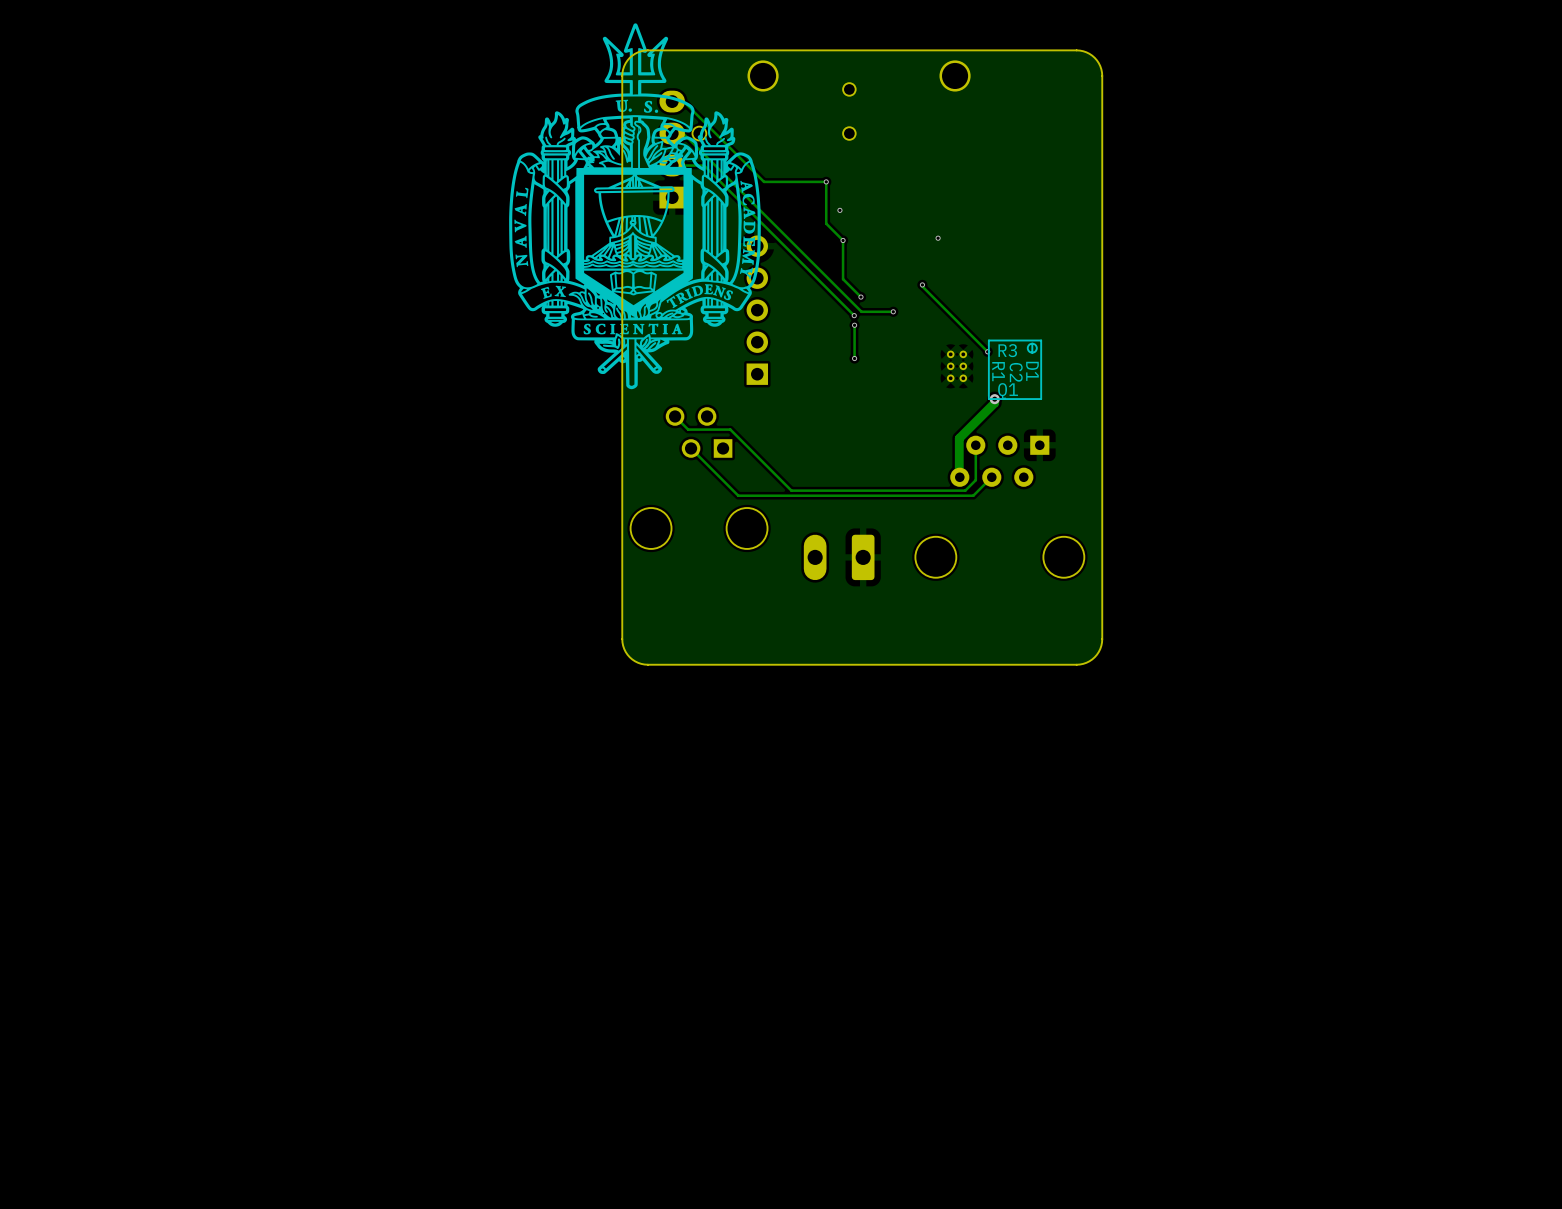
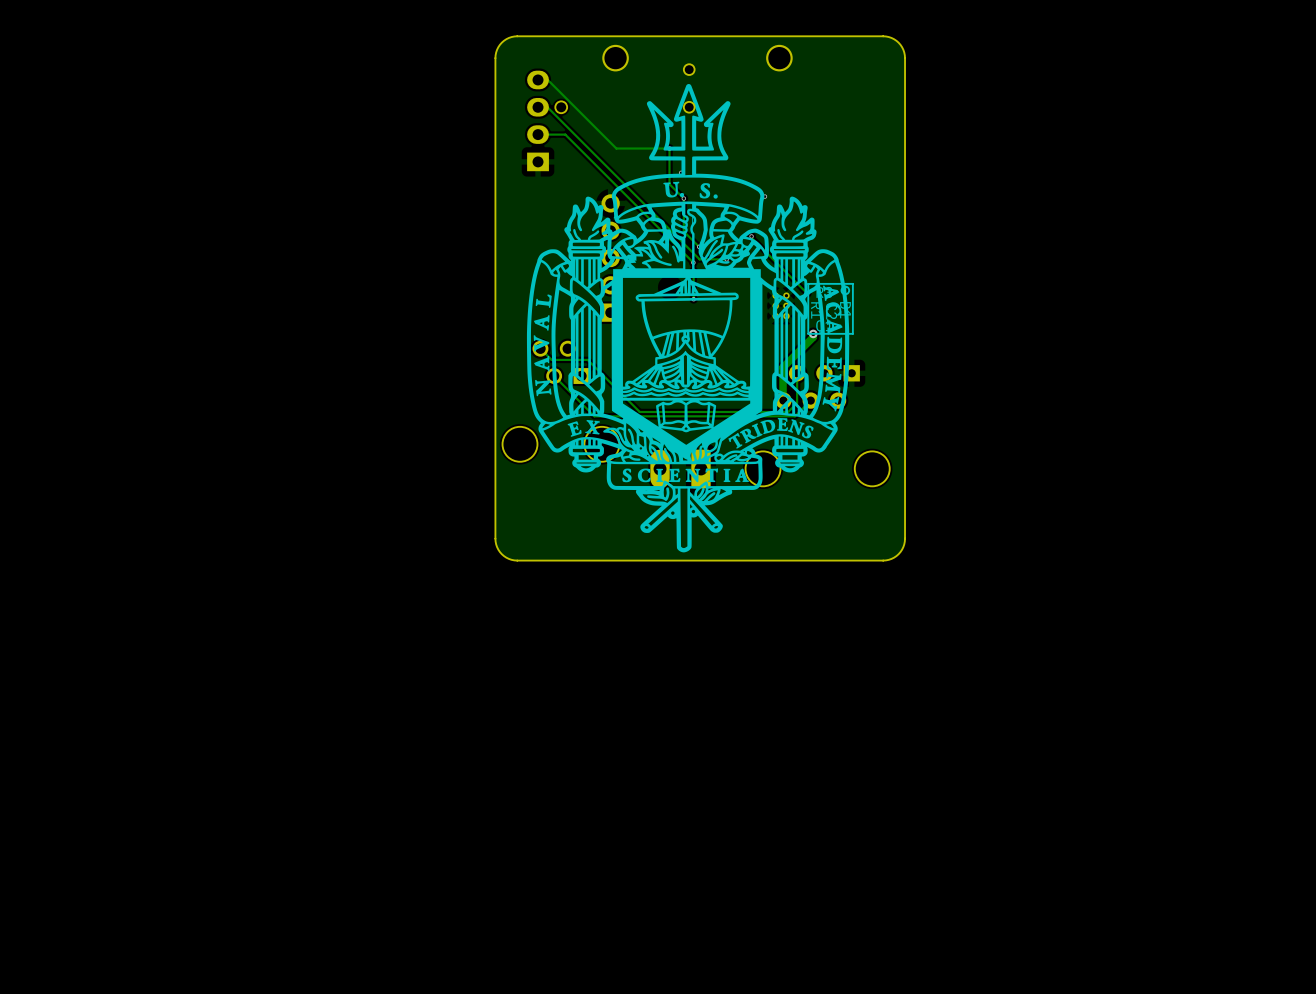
drawing: [509, 23, 761, 390] -> none
drawing: none -> [526, 83, 850, 553]

